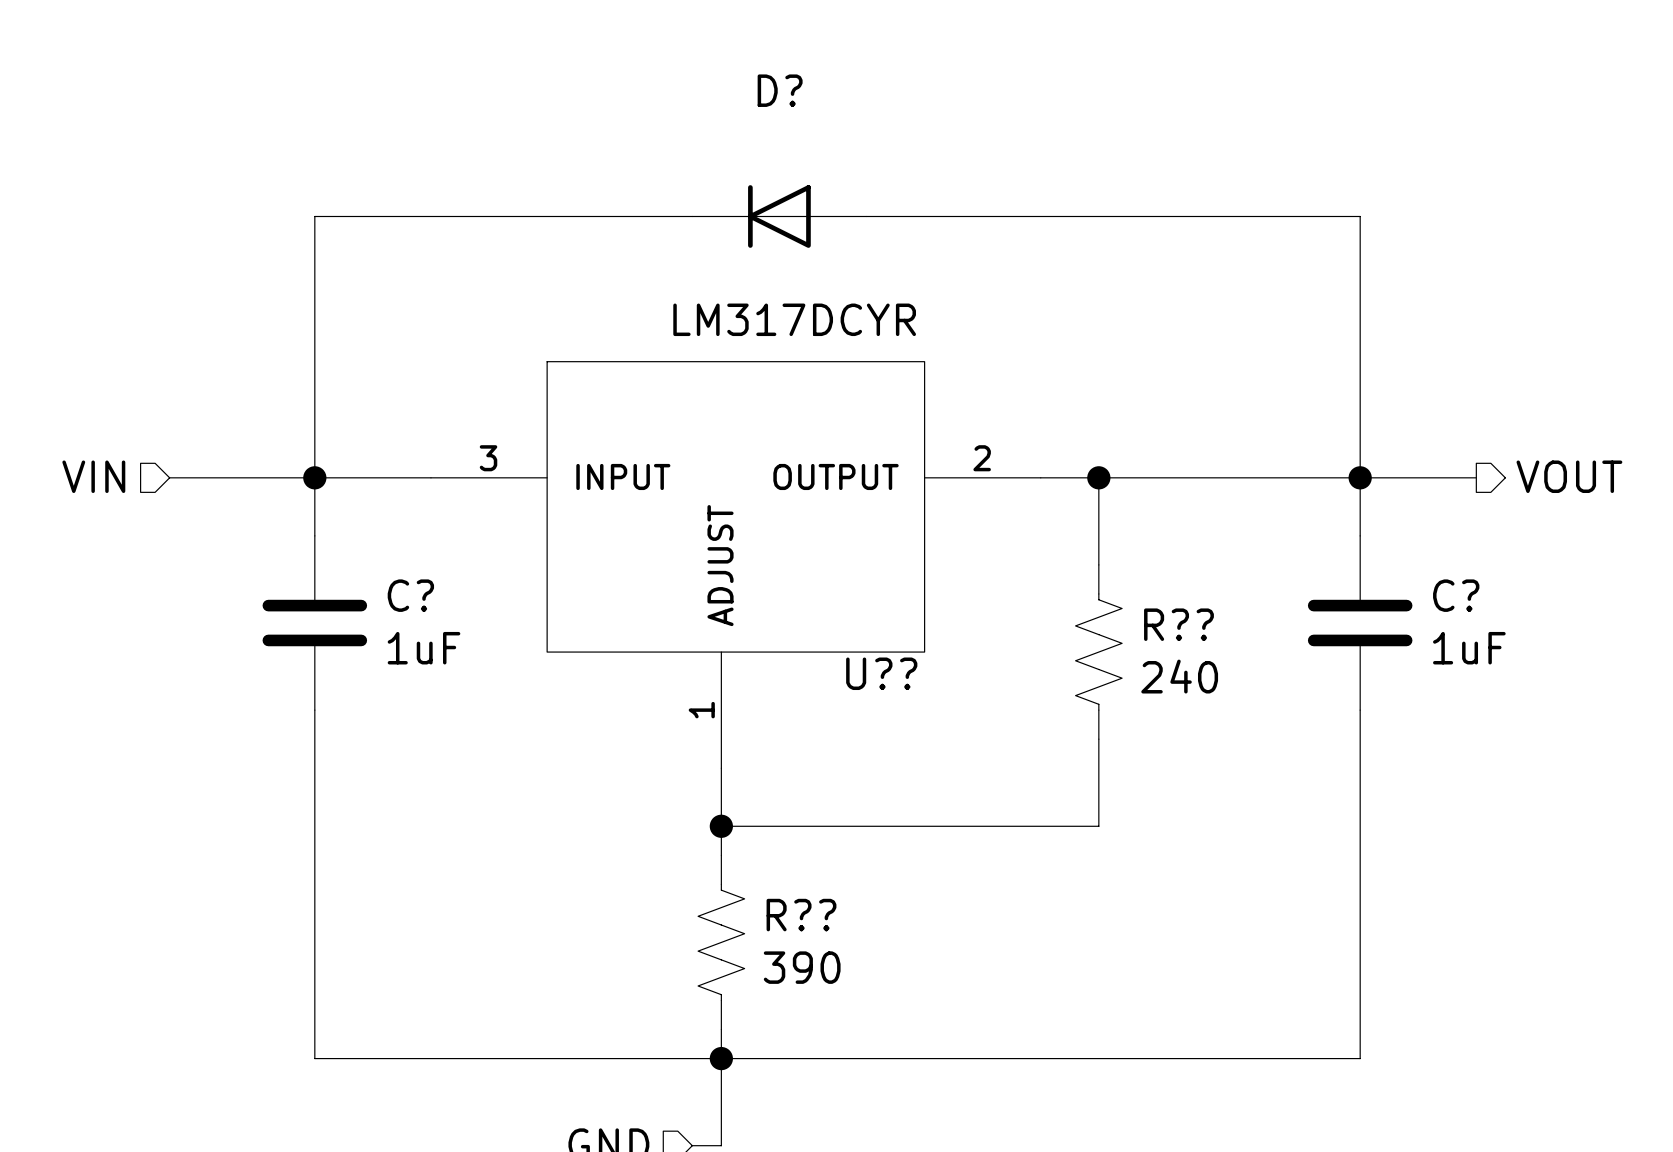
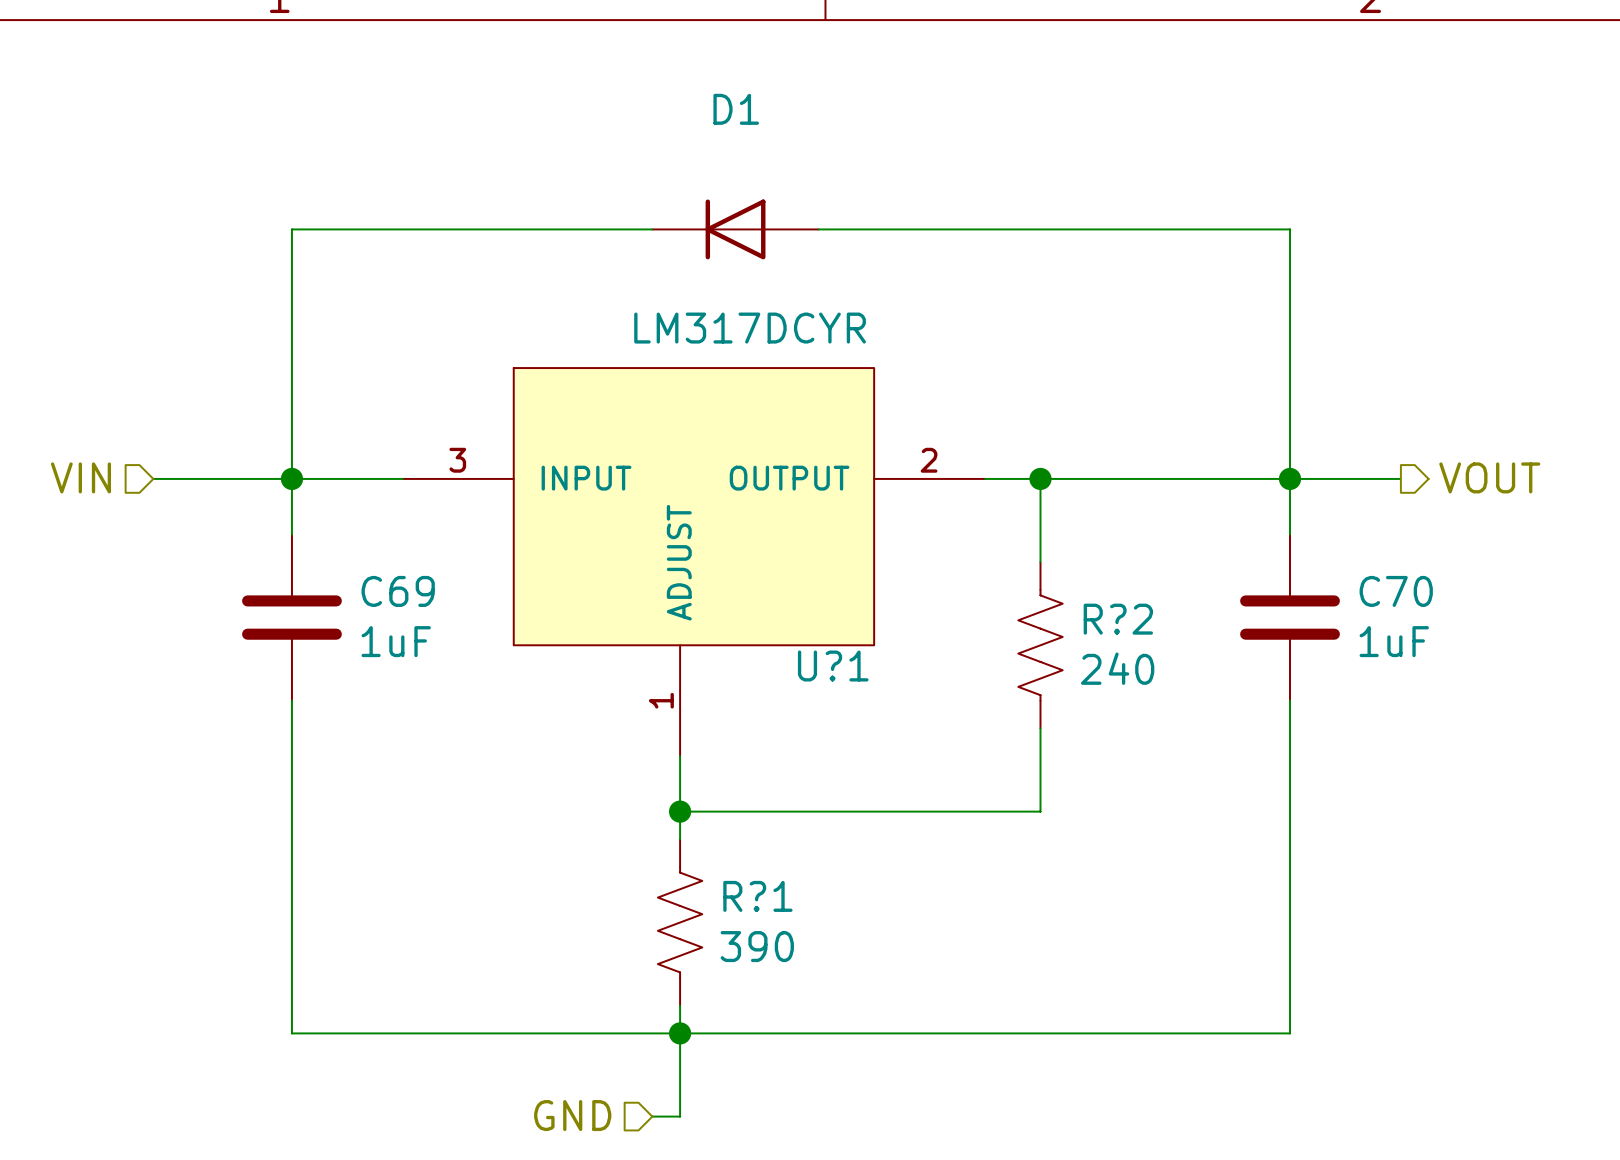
D? name: D? (780, 90) -> D1 (736, 109)
C? name: C? (410, 595) -> C69 (398, 591)
C? name: C? (1456, 595) -> C70 (1396, 591)
R?? name: R?? (1178, 624) -> R?2 (1118, 619)
U?? name: U?? (881, 673) -> U?1 (833, 666)
R?? name: R?? (801, 915) -> R?1 (757, 896)

